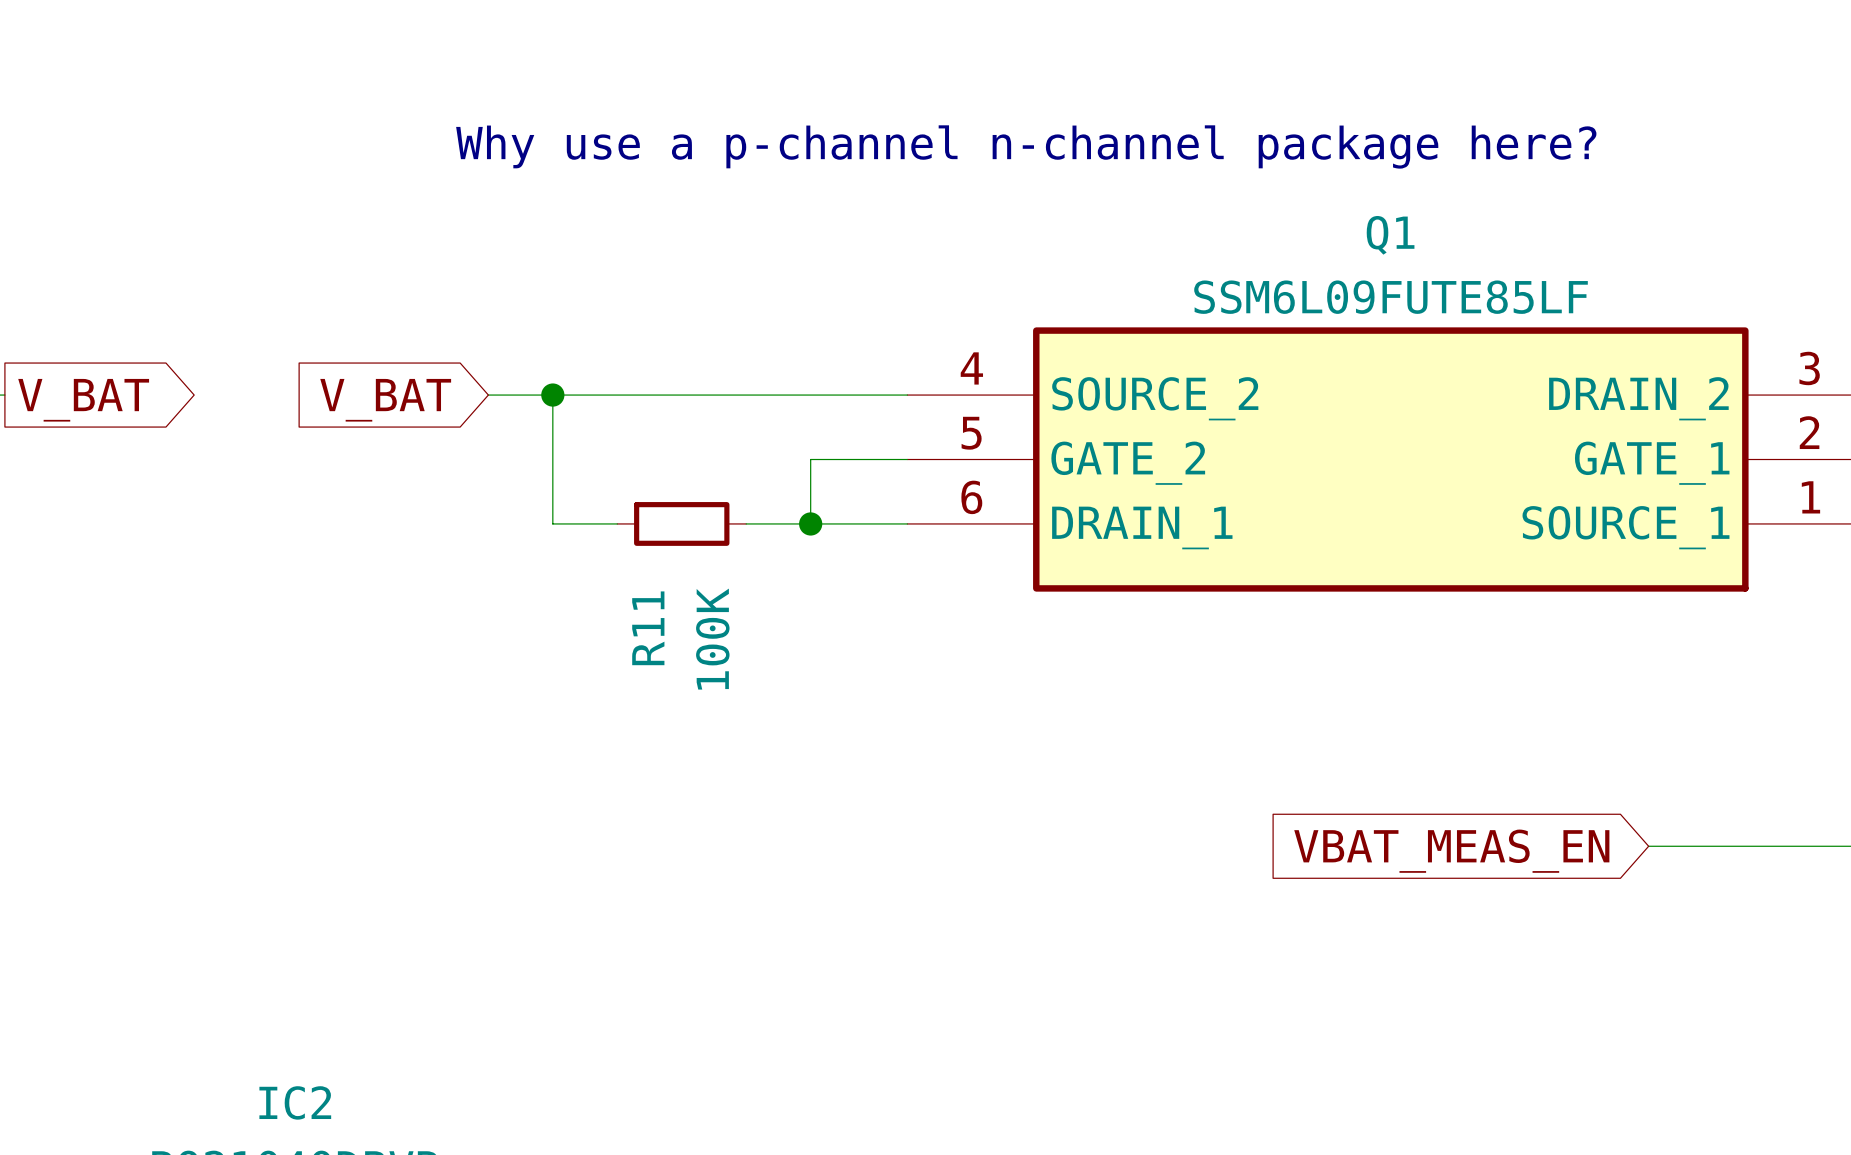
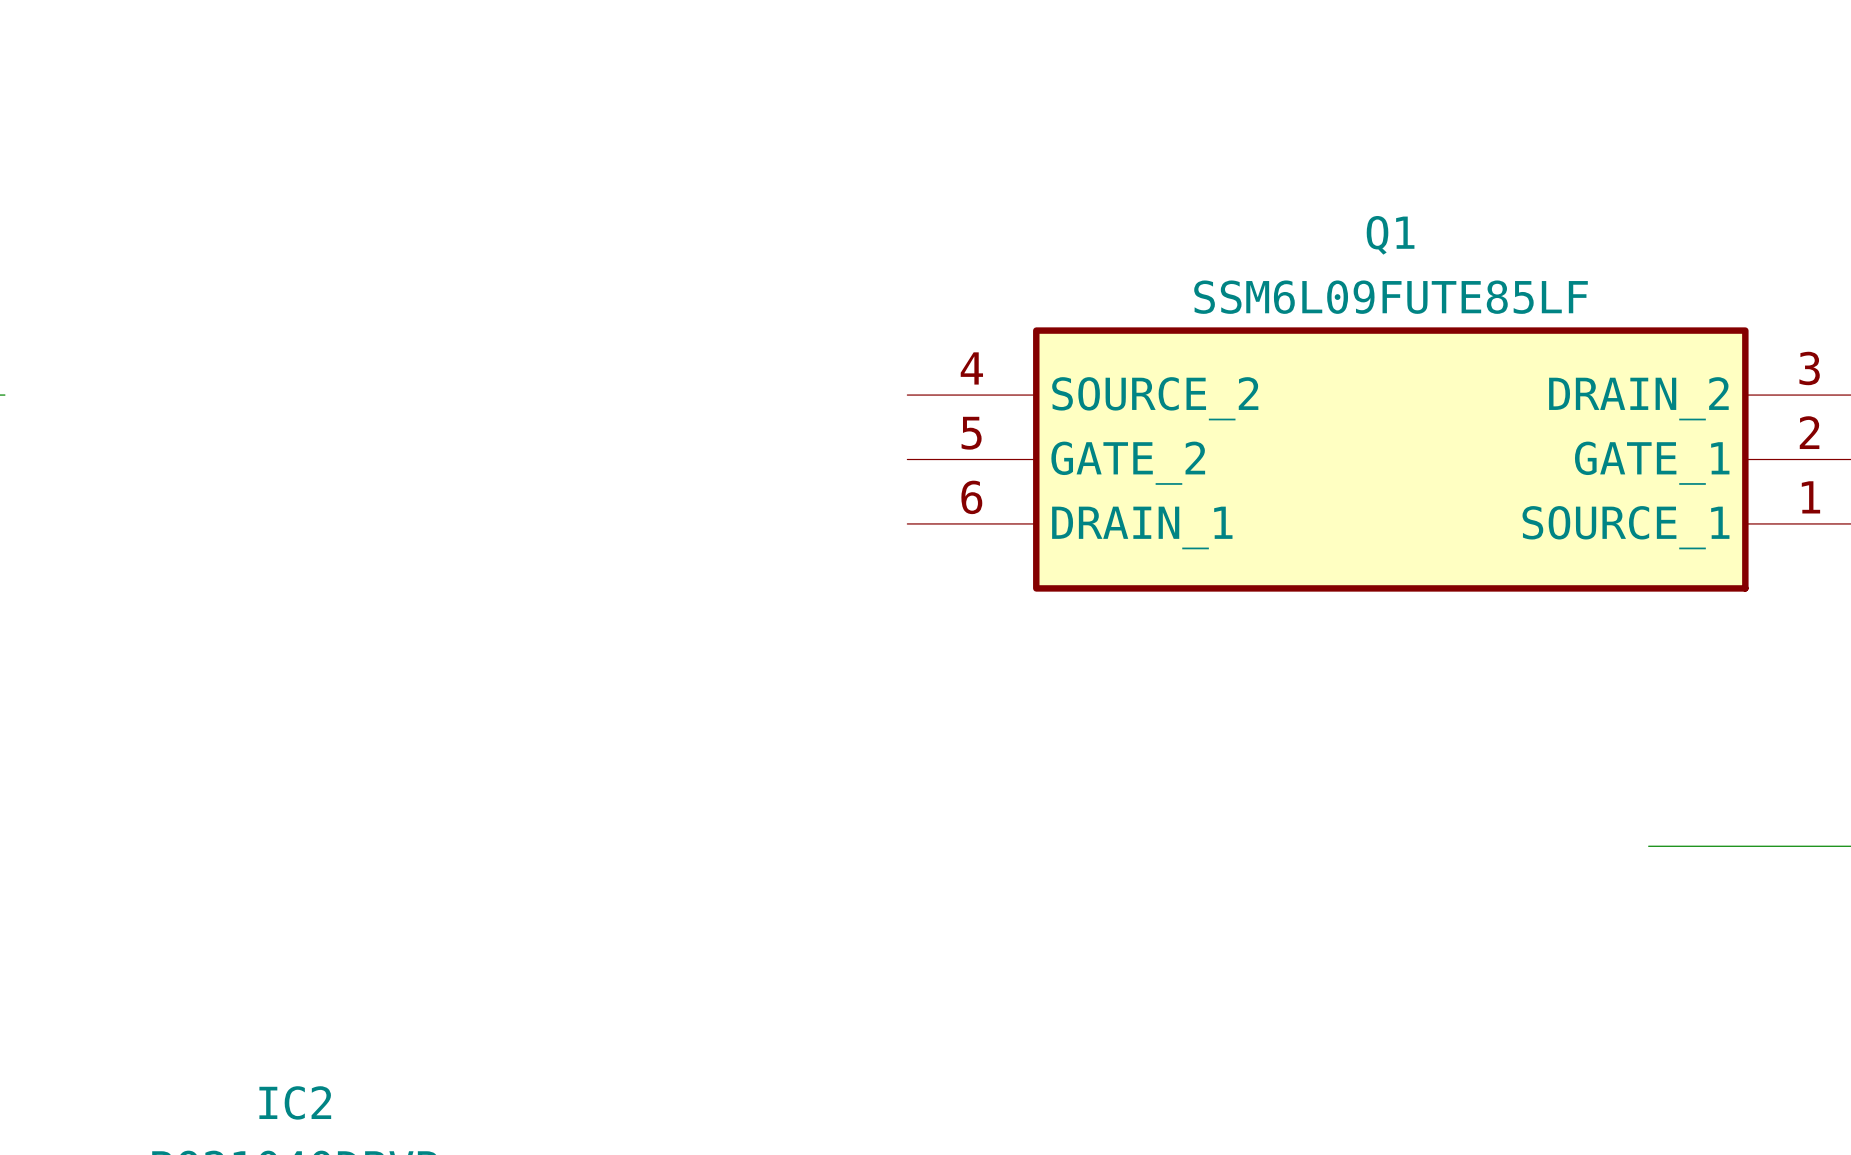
text: Why use a p-channel n-channel package here? (1026, 146) -> none
wire: (488, 395) (907, 395) -> none
wire: (552, 395) (552, 523) (617, 523) -> none
junction: (552, 395) -> none
global label: V_BAT (83, 400) -> none
global label: V_BAT (385, 400) -> none
wire: (907, 459) (810, 459) (810, 523) -> none
R11: 100K (681, 523) -> none
wire: (746, 523) (907, 523) -> none
junction: (810, 523) -> none
global label: VBAT_MEAS_EN (1451, 851) -> none

